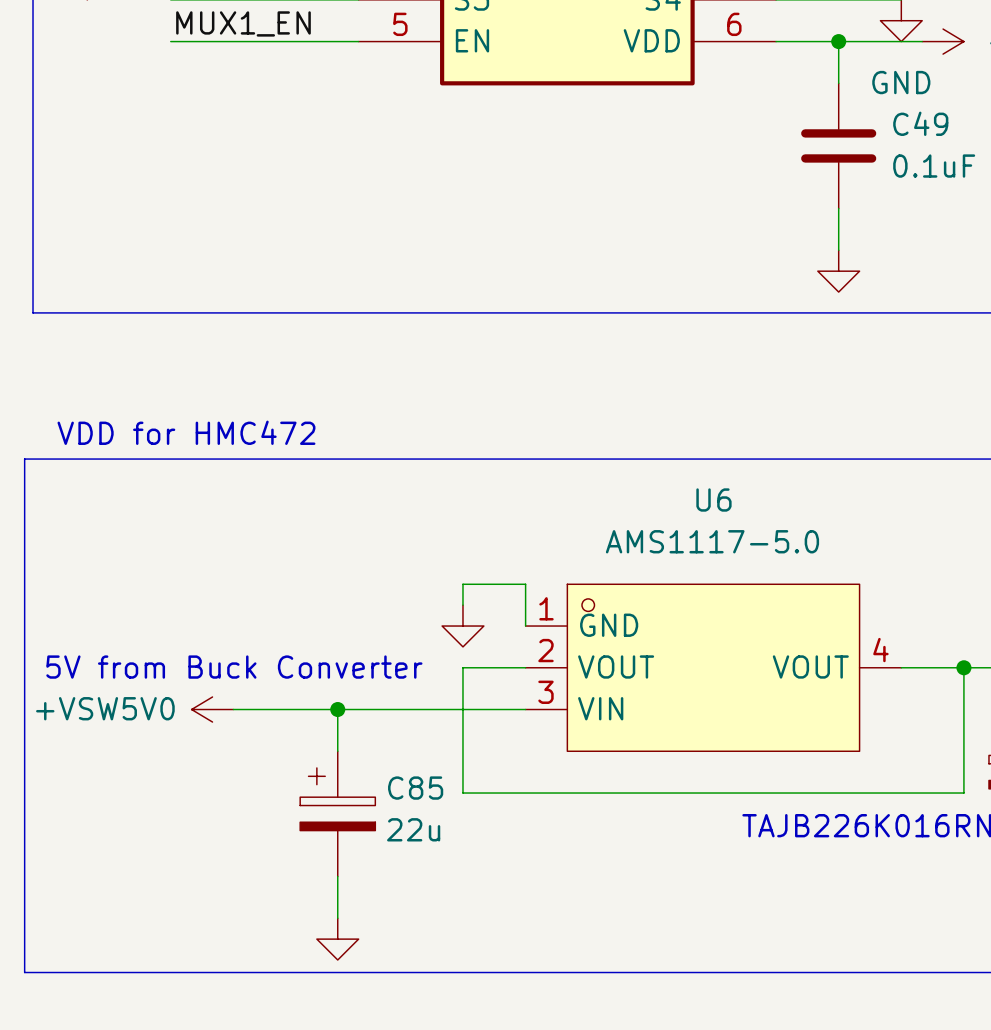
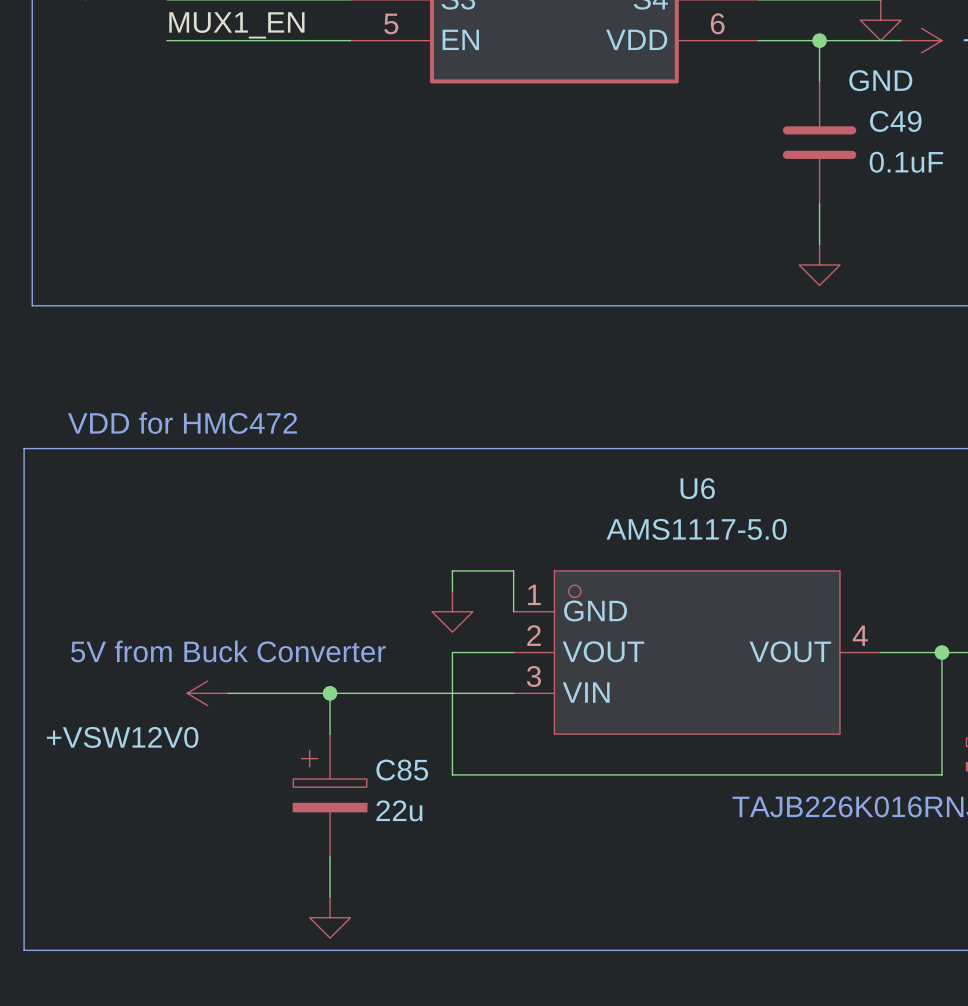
power symbol: +VSW5V0 (212, 709) -> +VSW12V0 (207, 693)

